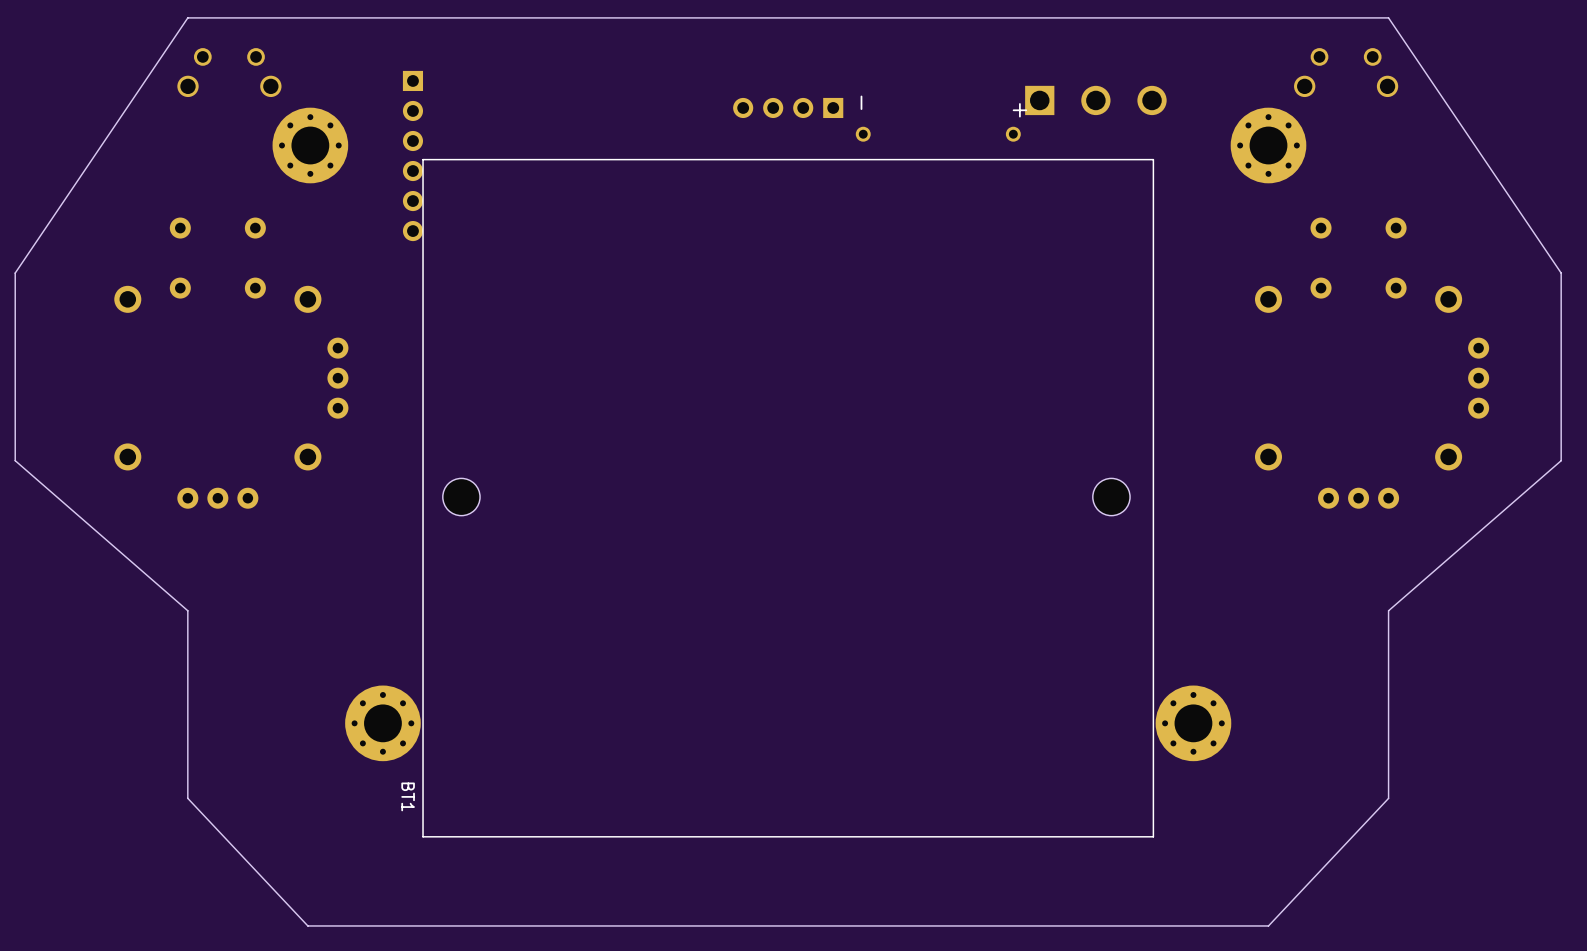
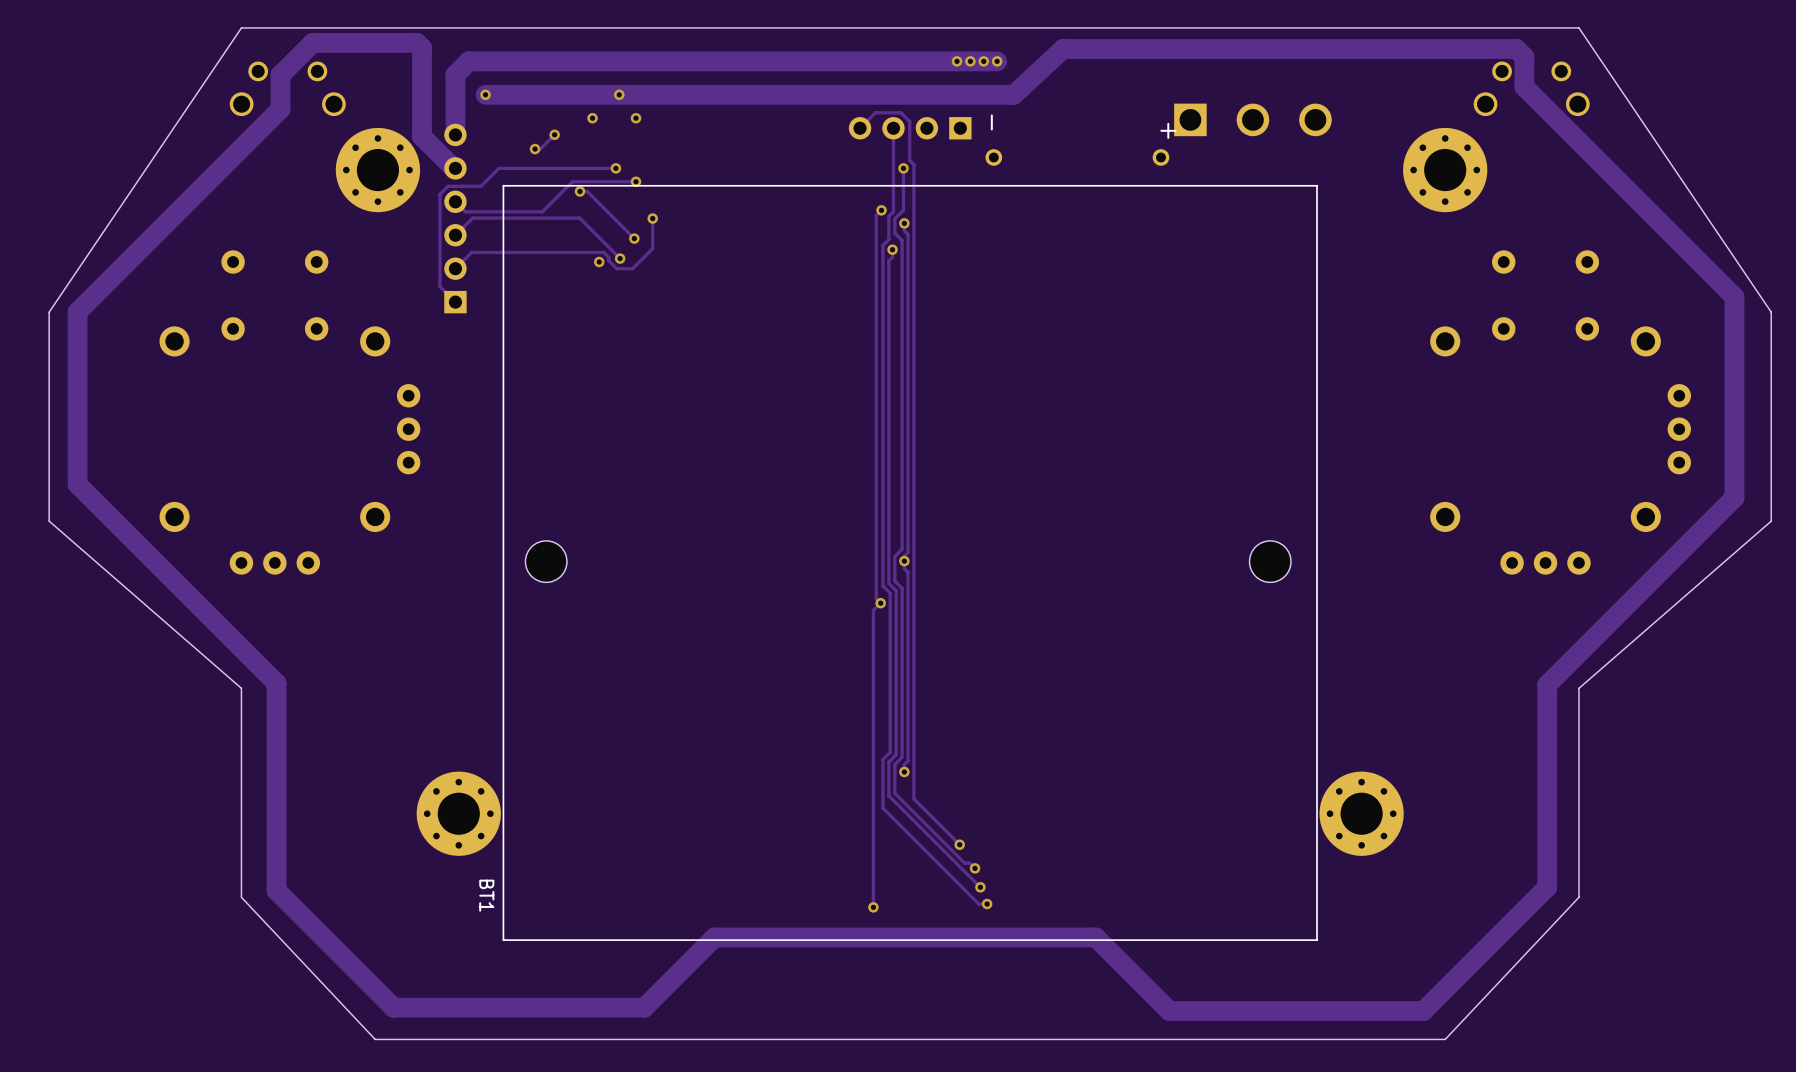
via: none -> (957, 61)
via: none -> (970, 61)
via: none -> (983, 61)
track: none -> (997, 61) (468, 61) (455, 74) (455, 134)
via: none -> (997, 61)
track: none -> (485, 94) (1013, 94) (1062, 49) (1516, 49) (1524, 57) (1524, 86) (1734, 296) (1734, 497) (1547, 685) (1547, 887) (1423, 1011) (1169, 1011) (1095, 937) (714, 937) (644, 1007) (393, 1007) (276, 890) (276, 683) (77, 484) (77, 312) (280, 109) (280, 75) (312, 42) (416, 42) (422, 48) (422, 136) (455, 168)
via: none -> (485, 94)
via: none -> (619, 94)
via: none -> (592, 118)
via: none -> (636, 118)
track: none -> (860, 128) (875, 112) (900, 112) (909, 121) (909, 160) (913, 164) (913, 798) (959, 844)
track: none -> (893, 128) (893, 211) (888, 216) (888, 239) (882, 245) (882, 585) (890, 593) (890, 752) (882, 759) (882, 808) (978, 904) (987, 904)
track: none -> (554, 134) (540, 149) (535, 149)
via: none -> (554, 134)
via: none -> (535, 149)
track: none -> (615, 168) (498, 168) (480, 186) (448, 186) (439, 194) (439, 286) (455, 302)
via: none -> (615, 168)
track: none -> (903, 168) (903, 210) (894, 218) (894, 233) (902, 240) (902, 549) (894, 556) (894, 581) (902, 588) (902, 757) (894, 764) (894, 793) (964, 863) (969, 863) (975, 868)
via: none -> (903, 168)
part rotation: 0° (412, 156) -> 180° (455, 218)
track: none -> (636, 181) (572, 181) (542, 211) (465, 211) (455, 201)
via: none -> (636, 181)
track: none -> (580, 191) (587, 191) (634, 238)
via: none -> (580, 191)
track: none -> (881, 210) (876, 215) (876, 598) (880, 603) (873, 610) (873, 907)
via: none -> (881, 210)
track: none -> (652, 218) (652, 248) (632, 268) (616, 268) (603, 252) (471, 252) (455, 268)
via: none -> (652, 218)
track: none -> (904, 223) (904, 230) (908, 234) (908, 552) (904, 556) (904, 568) (908, 572) (908, 760) (904, 764) (904, 771)
via: none -> (904, 223)
track: none -> (455, 235) (472, 218) (579, 218) (620, 258)
via: none -> (634, 238)
track: none -> (892, 249) (892, 257) (888, 260) (888, 583) (896, 590) (896, 754) (888, 762) (888, 795) (980, 887)
via: none -> (892, 249)
via: none -> (620, 258)
via: none -> (599, 262)
via: none -> (904, 561)
via: none -> (880, 603)
via: none -> (904, 771)
via: none -> (959, 844)
via: none -> (975, 868)
via: none -> (980, 887)
via: none -> (987, 904)
via: none -> (873, 907)

